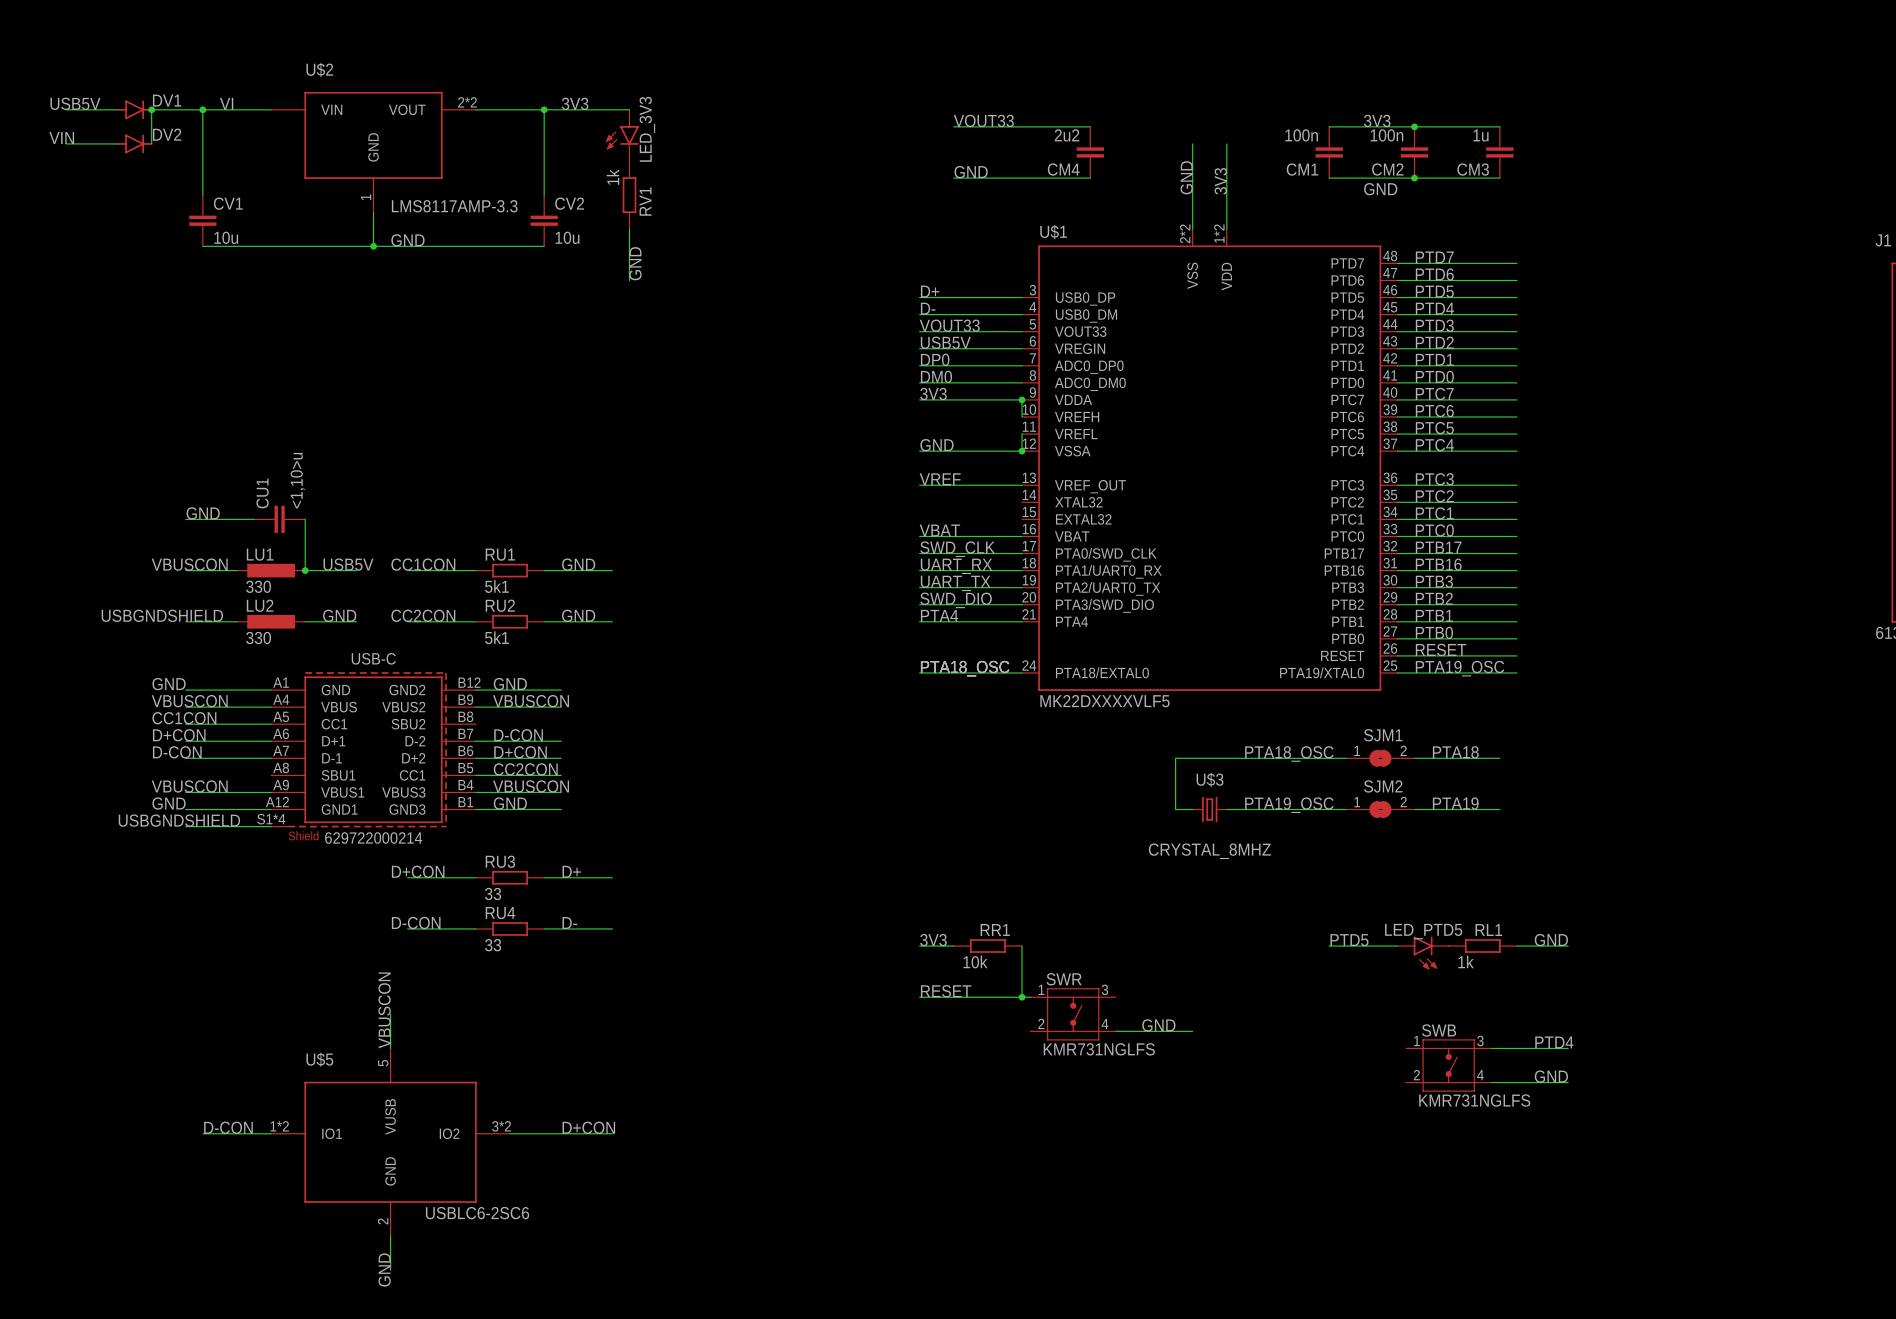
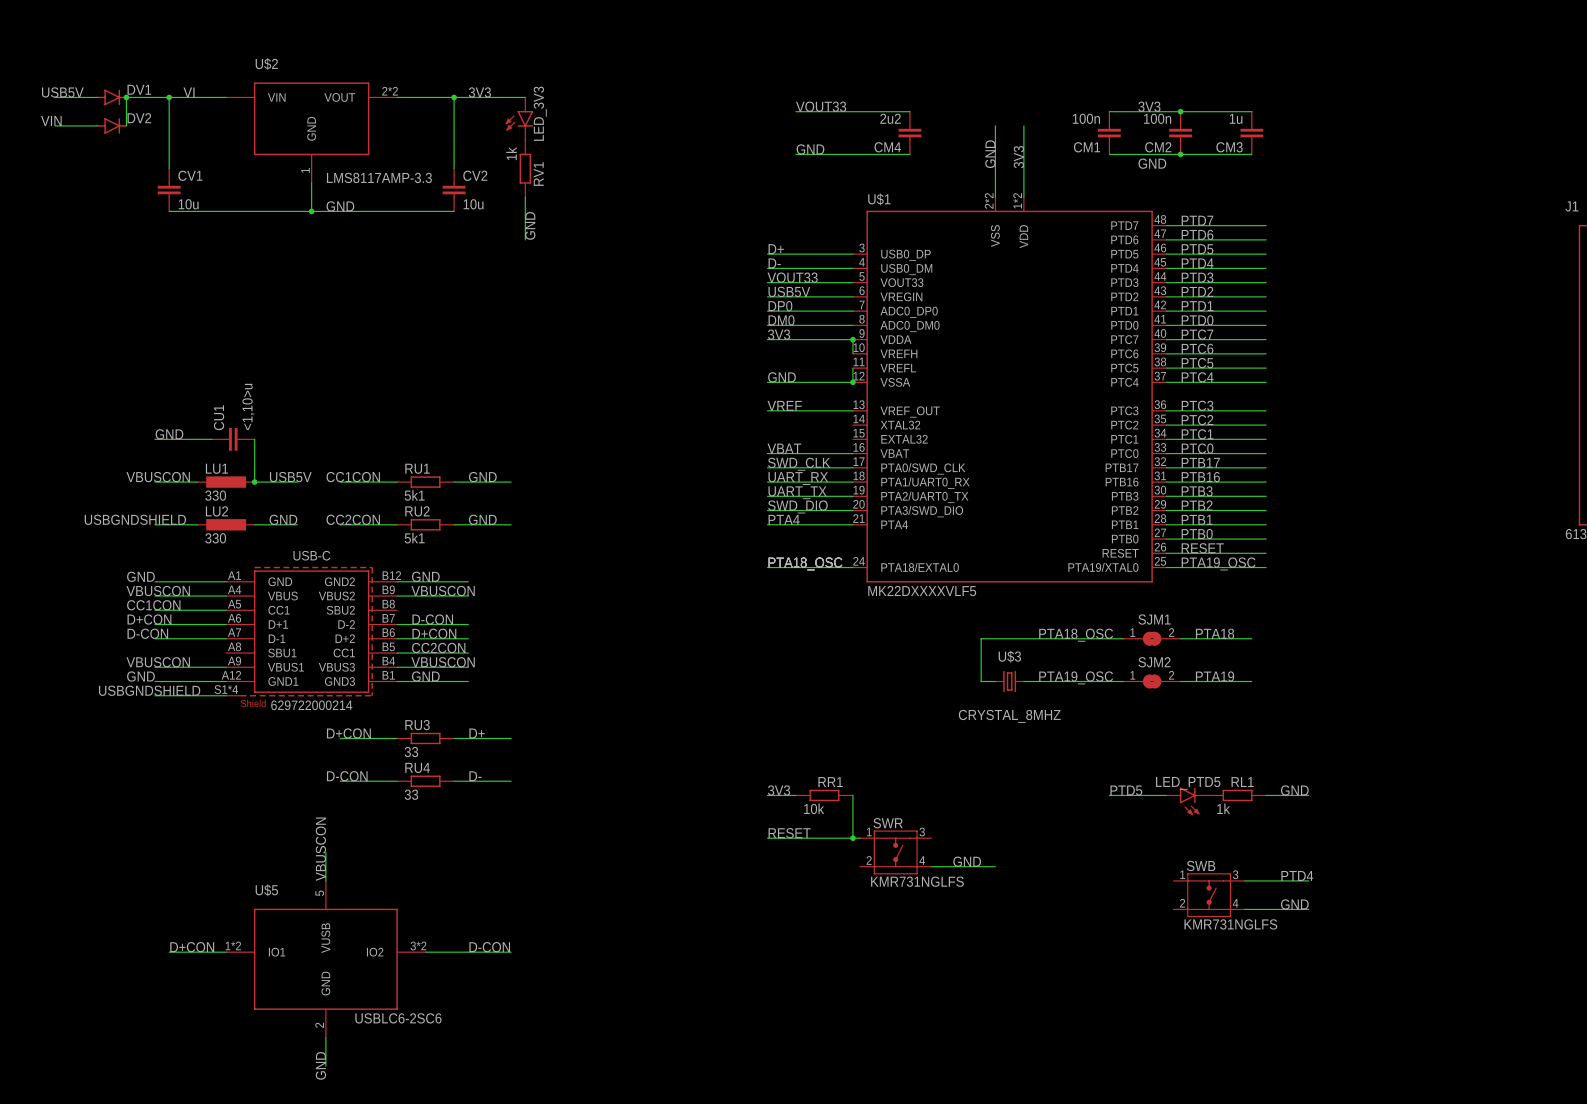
label: D-CON (228, 1127) -> D+CON (192, 947)
label: D+CON (588, 1127) -> D-CON (489, 947)

